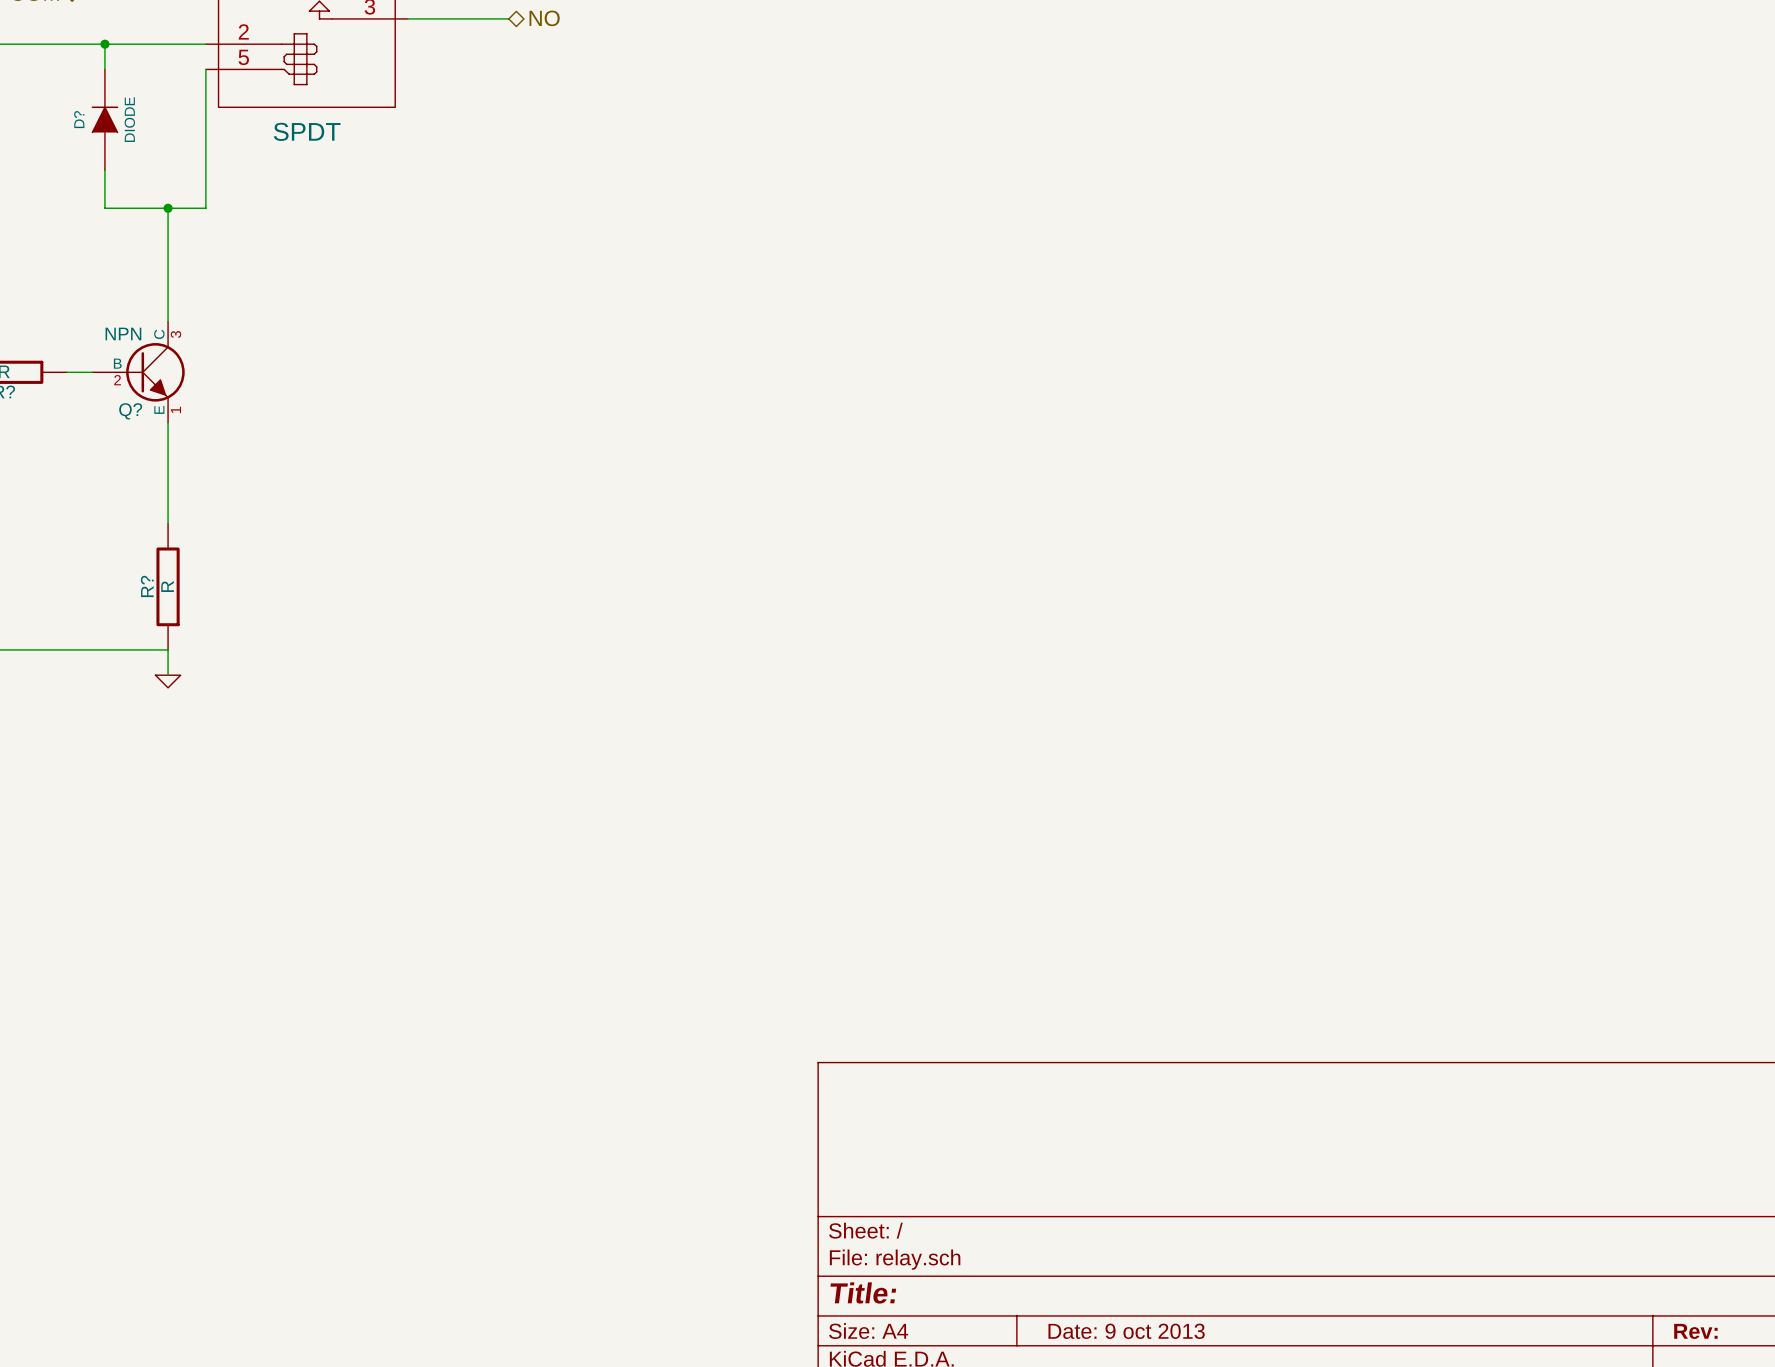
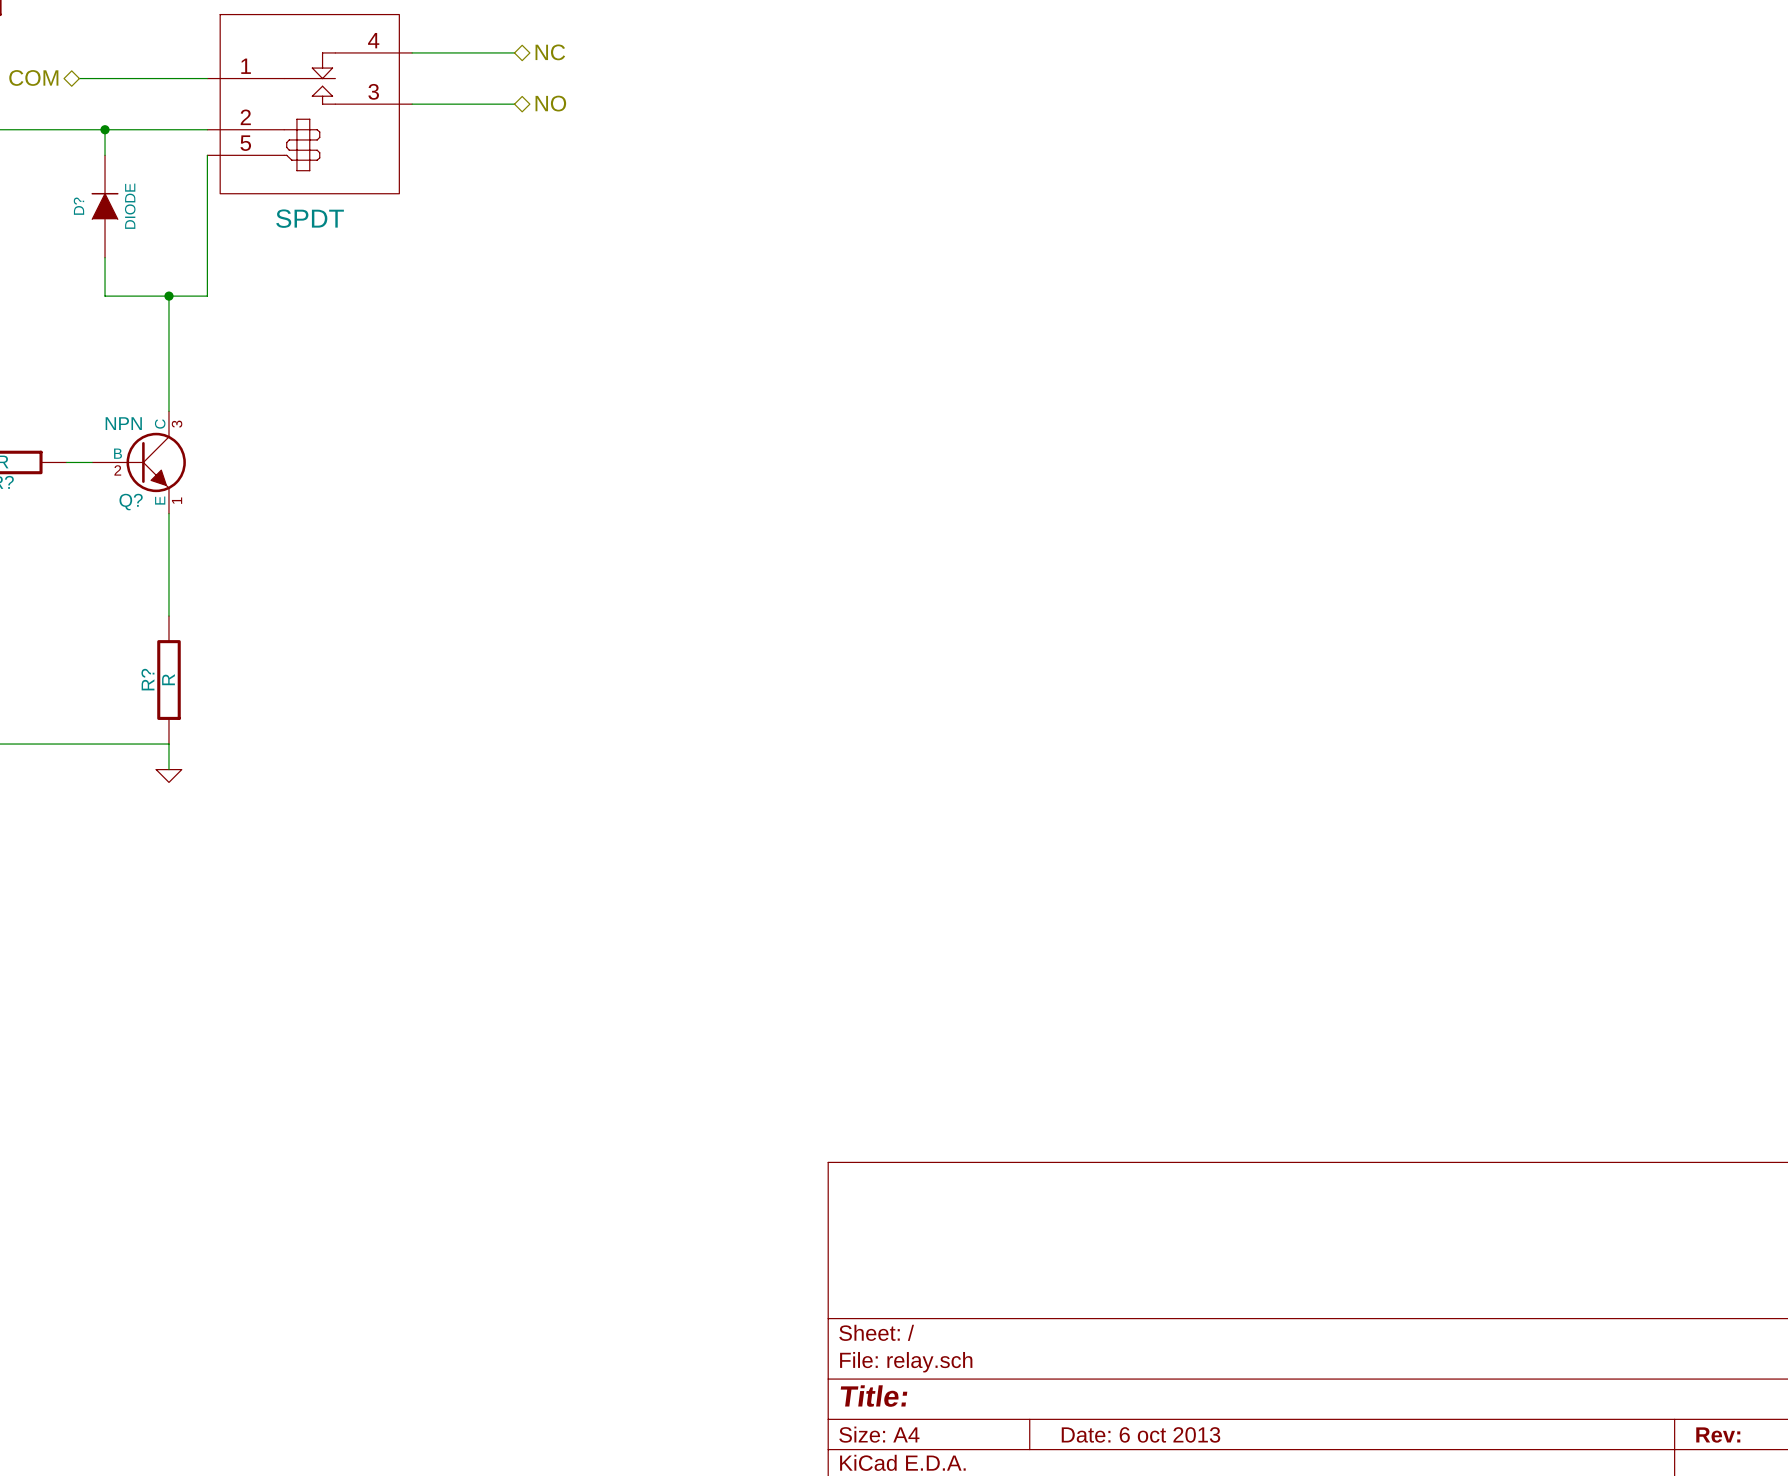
title block: Date: 9 oct 2013 (1126, 1331) -> Date: 6 oct 2013 (1140, 1434)

